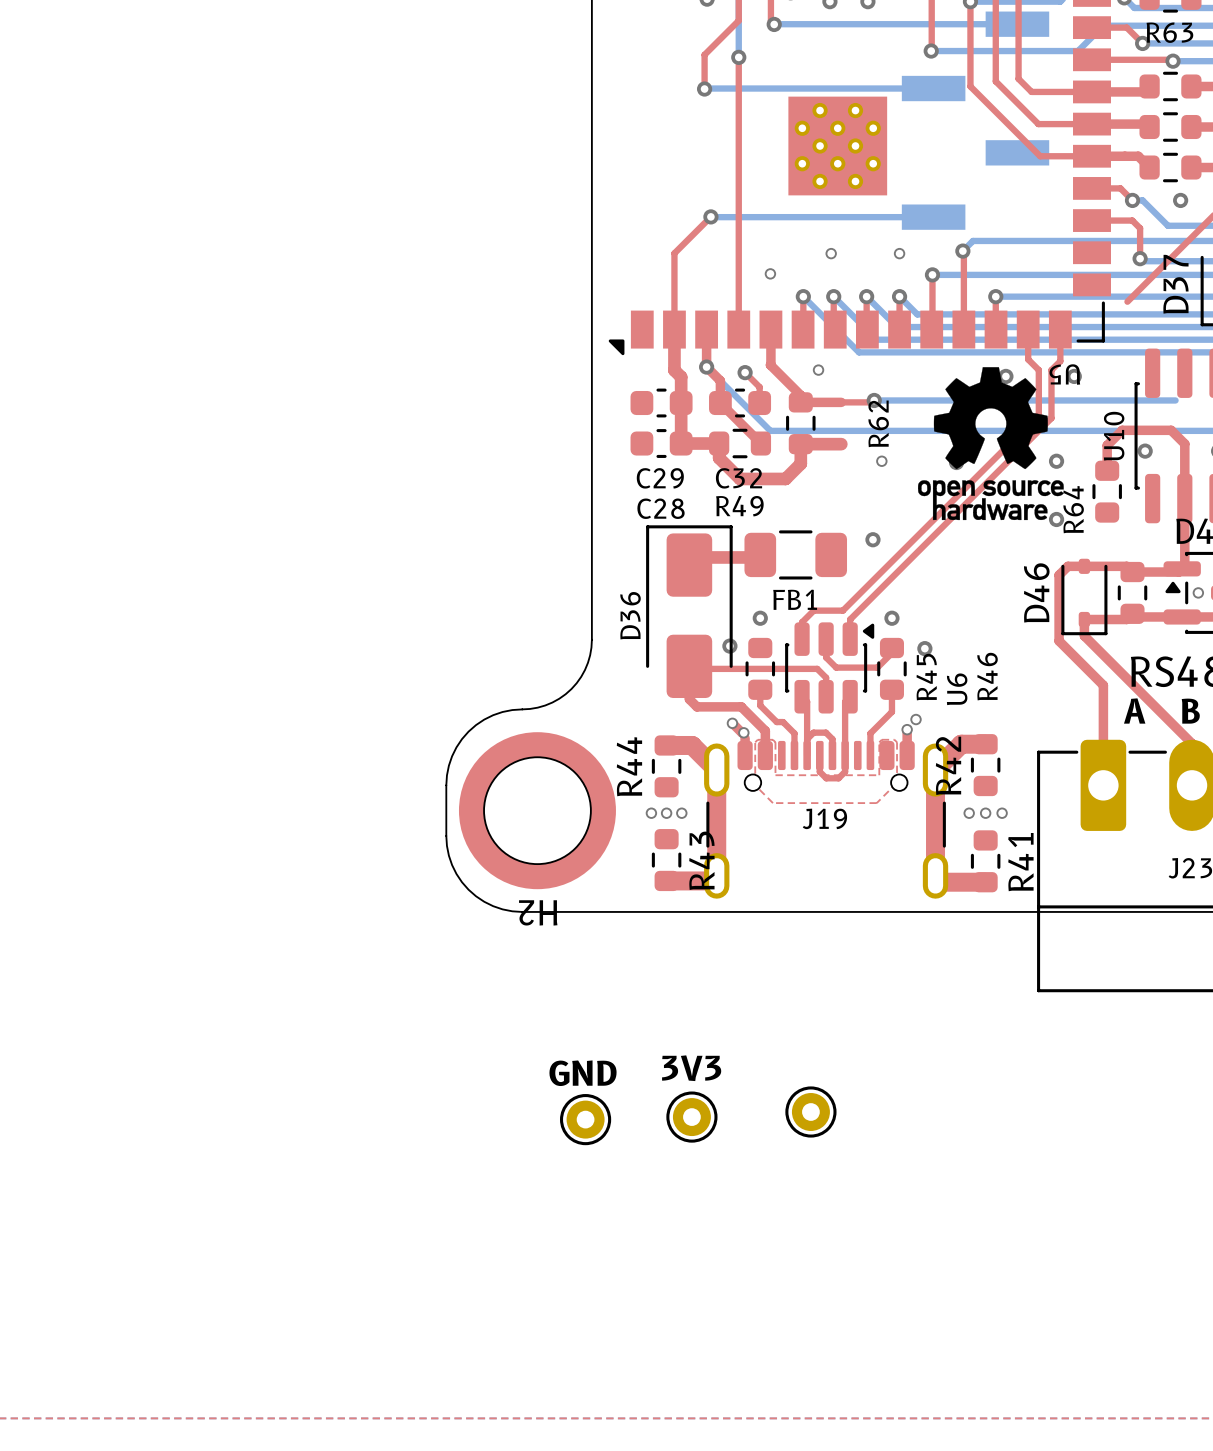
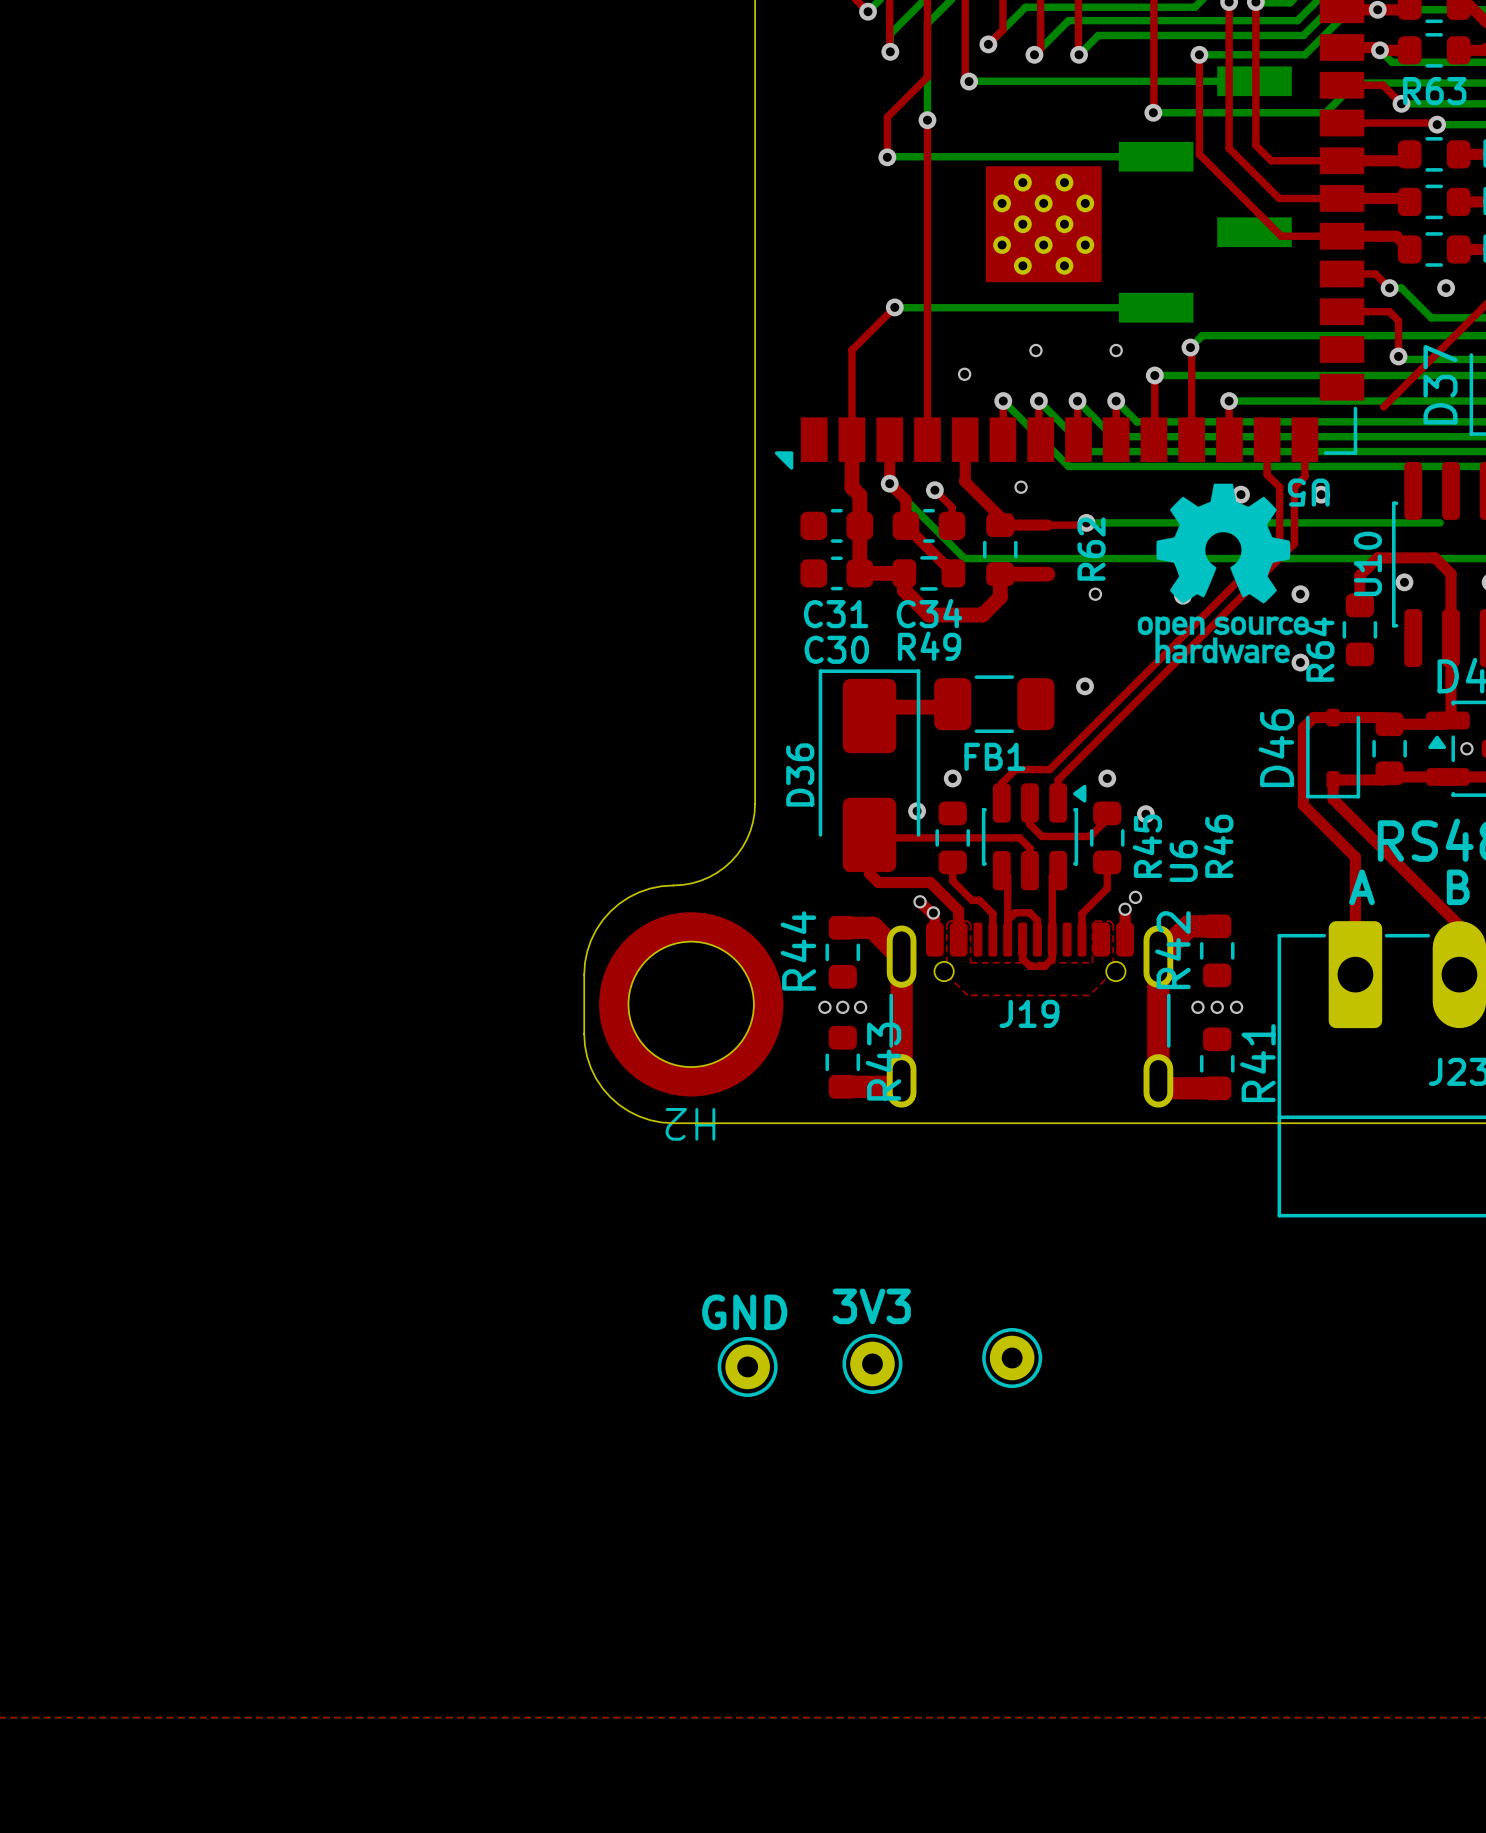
C29 name: C29 (660, 478) -> C31 (836, 614)
C32 name: C32 (739, 478) -> C34 (929, 613)
C28 name: C28 (661, 508) -> C30 (836, 649)

